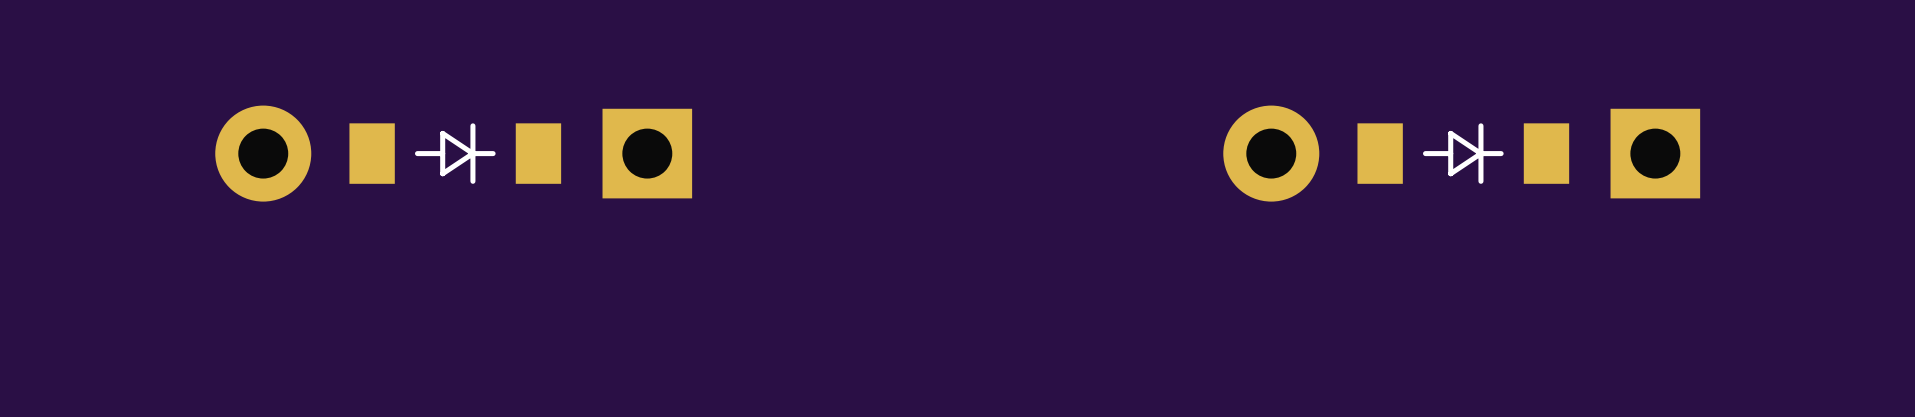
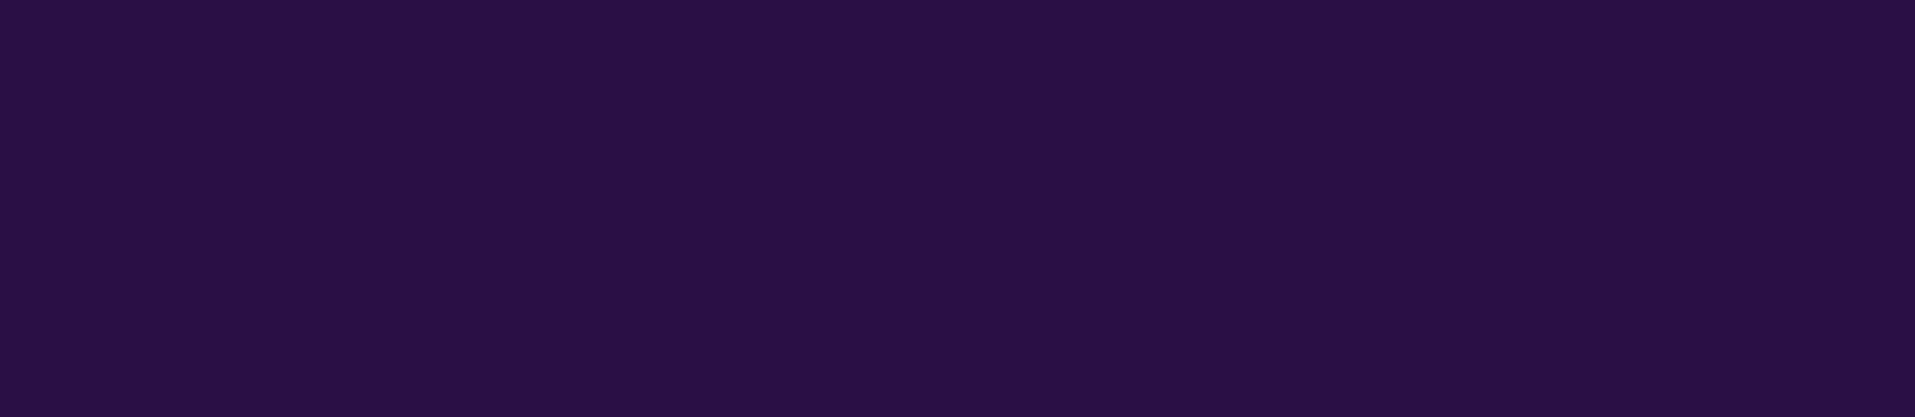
part: (453, 153) -> none
part: (1461, 153) -> none

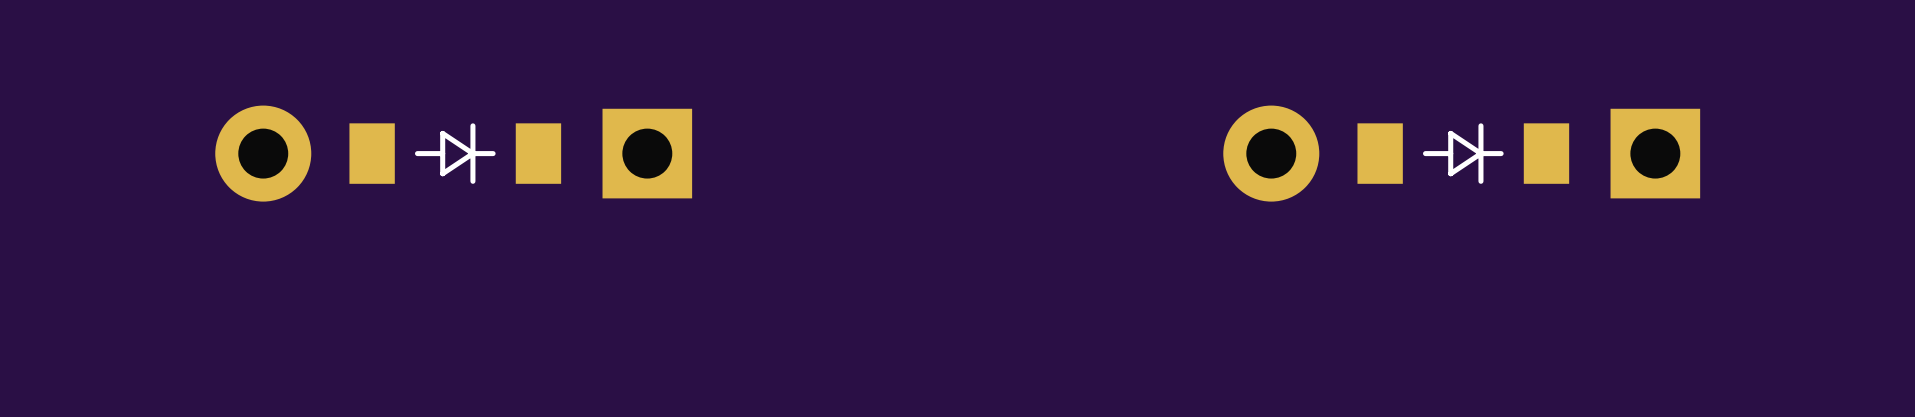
part: none -> (453, 153)
part: none -> (1461, 153)

